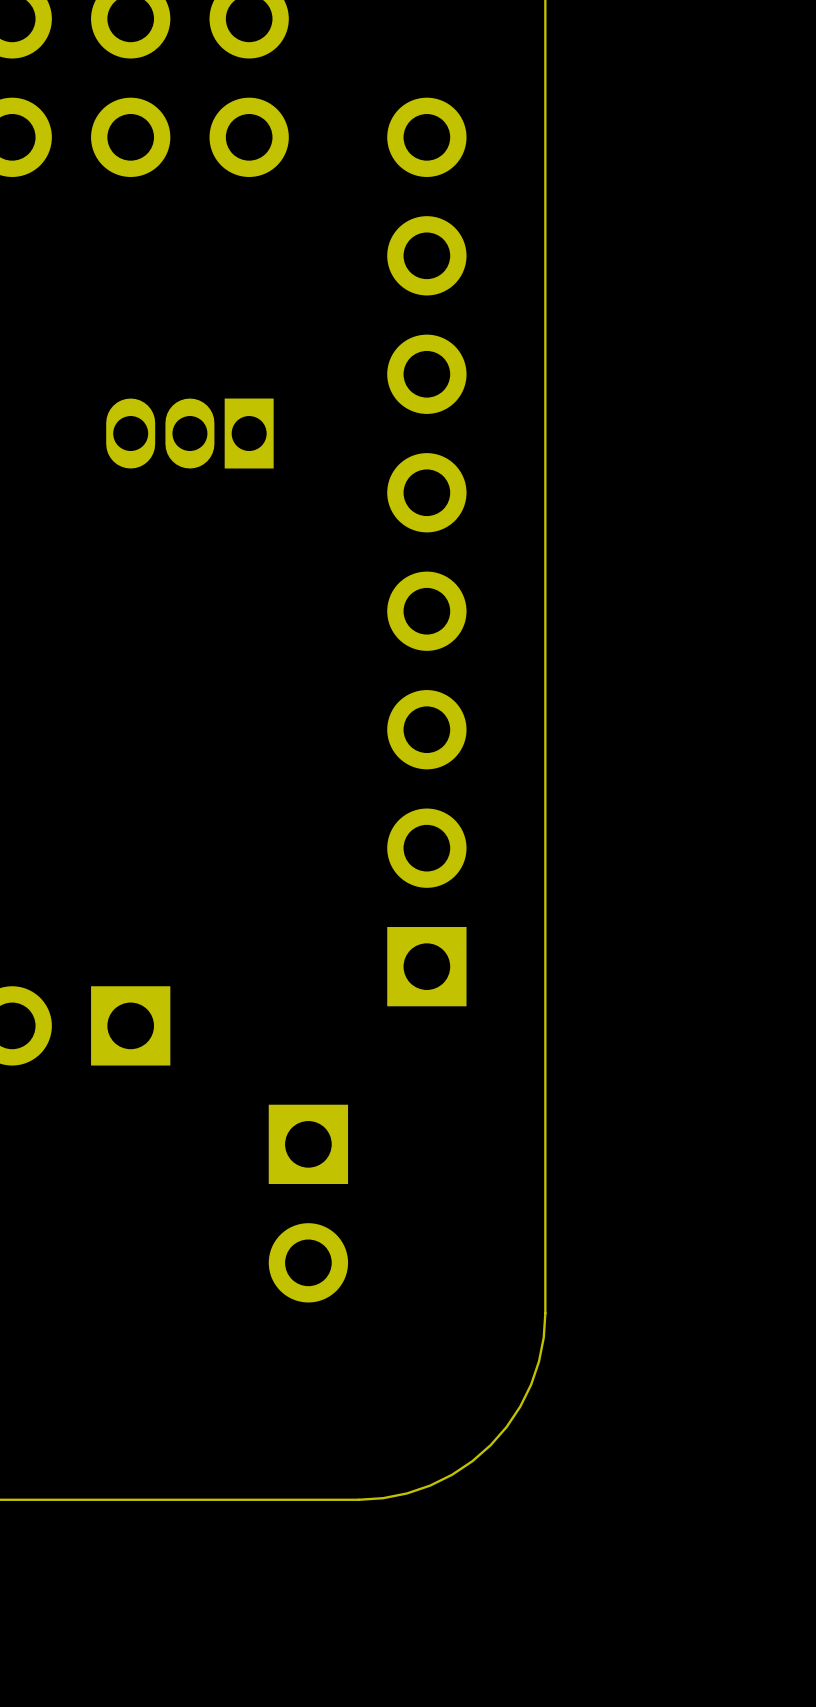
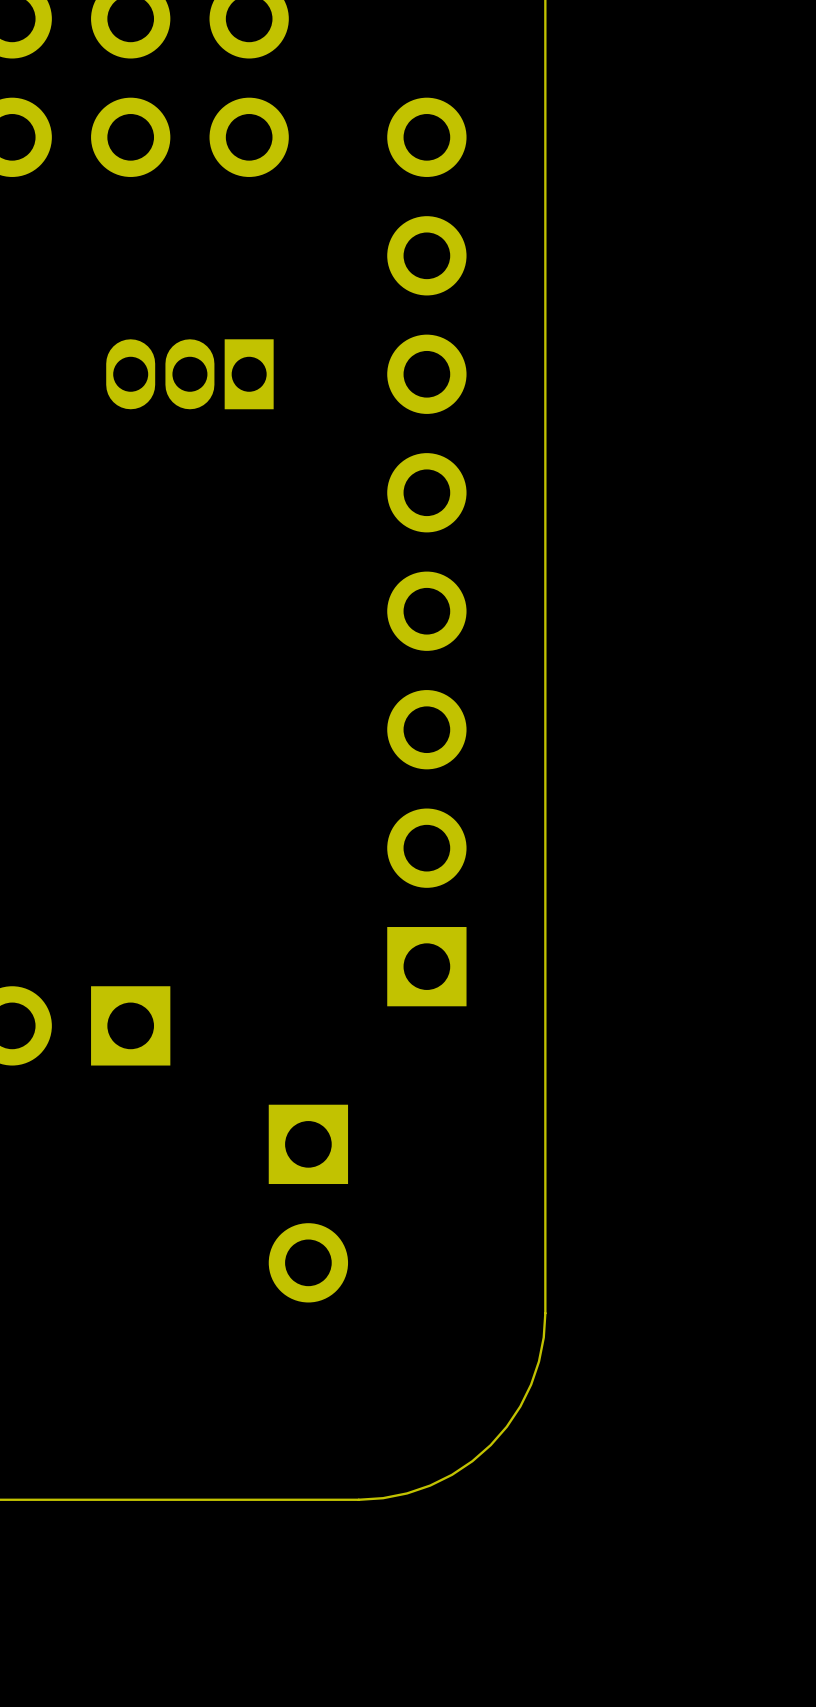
part position: (189, 433) -> (189, 374)

